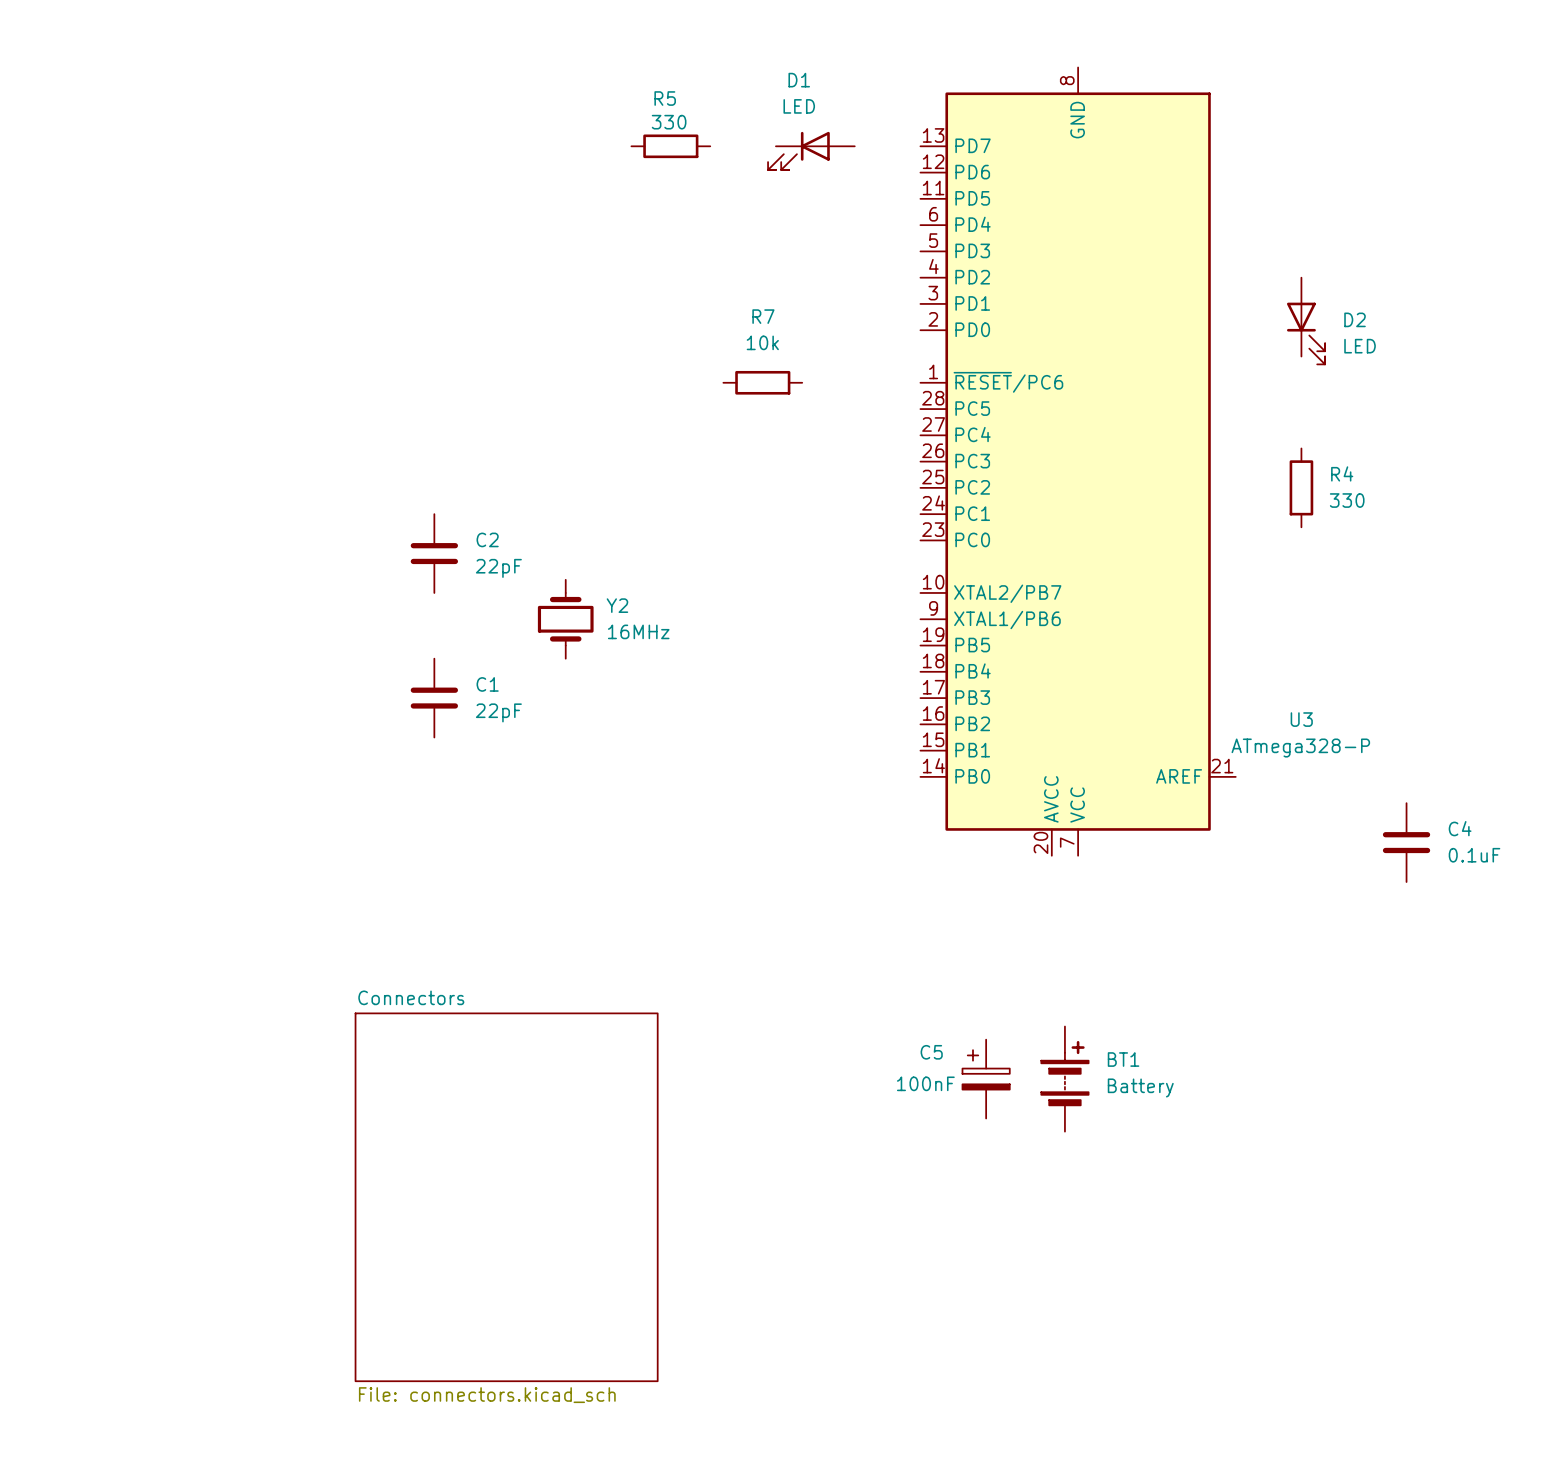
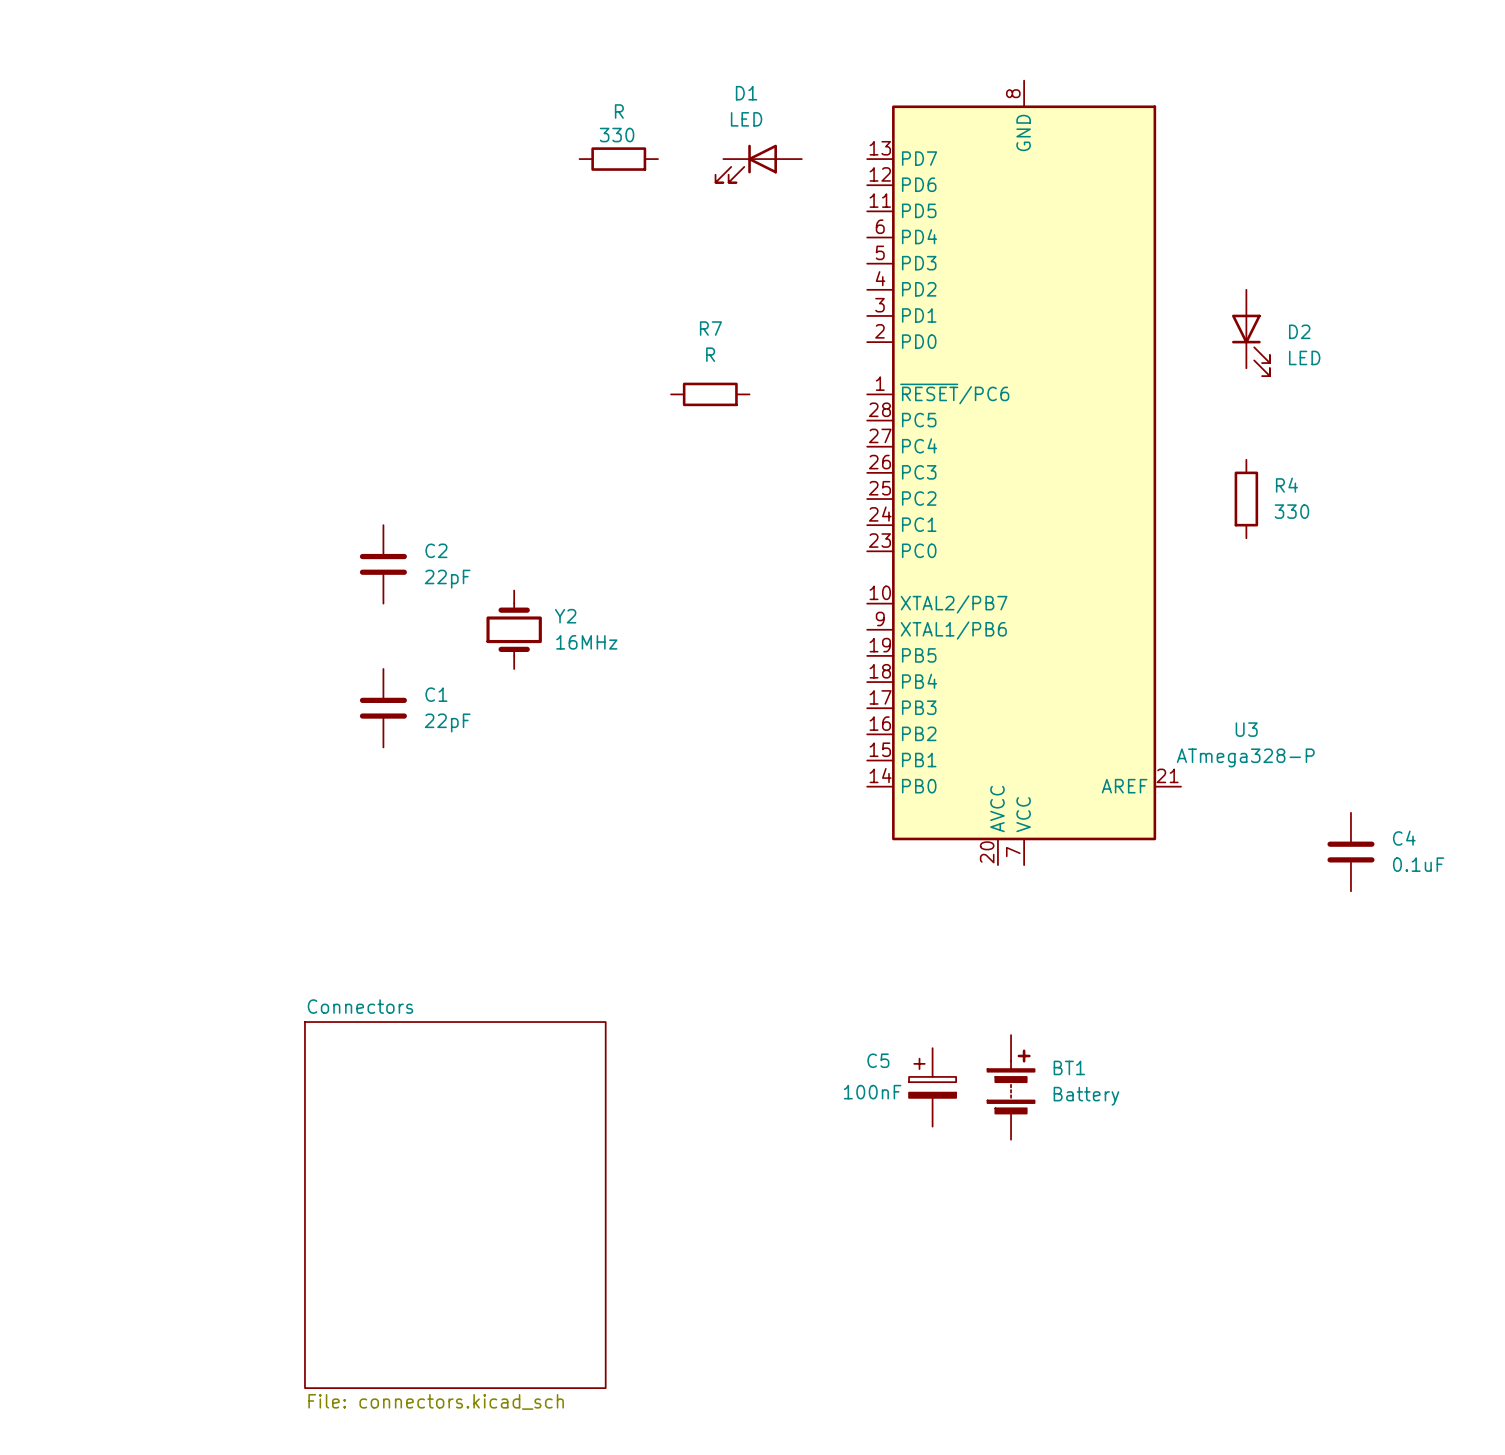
R5 name: R5 (665, 98) -> R (619, 111)
R7 value: 10k (762, 342) -> R (710, 354)

